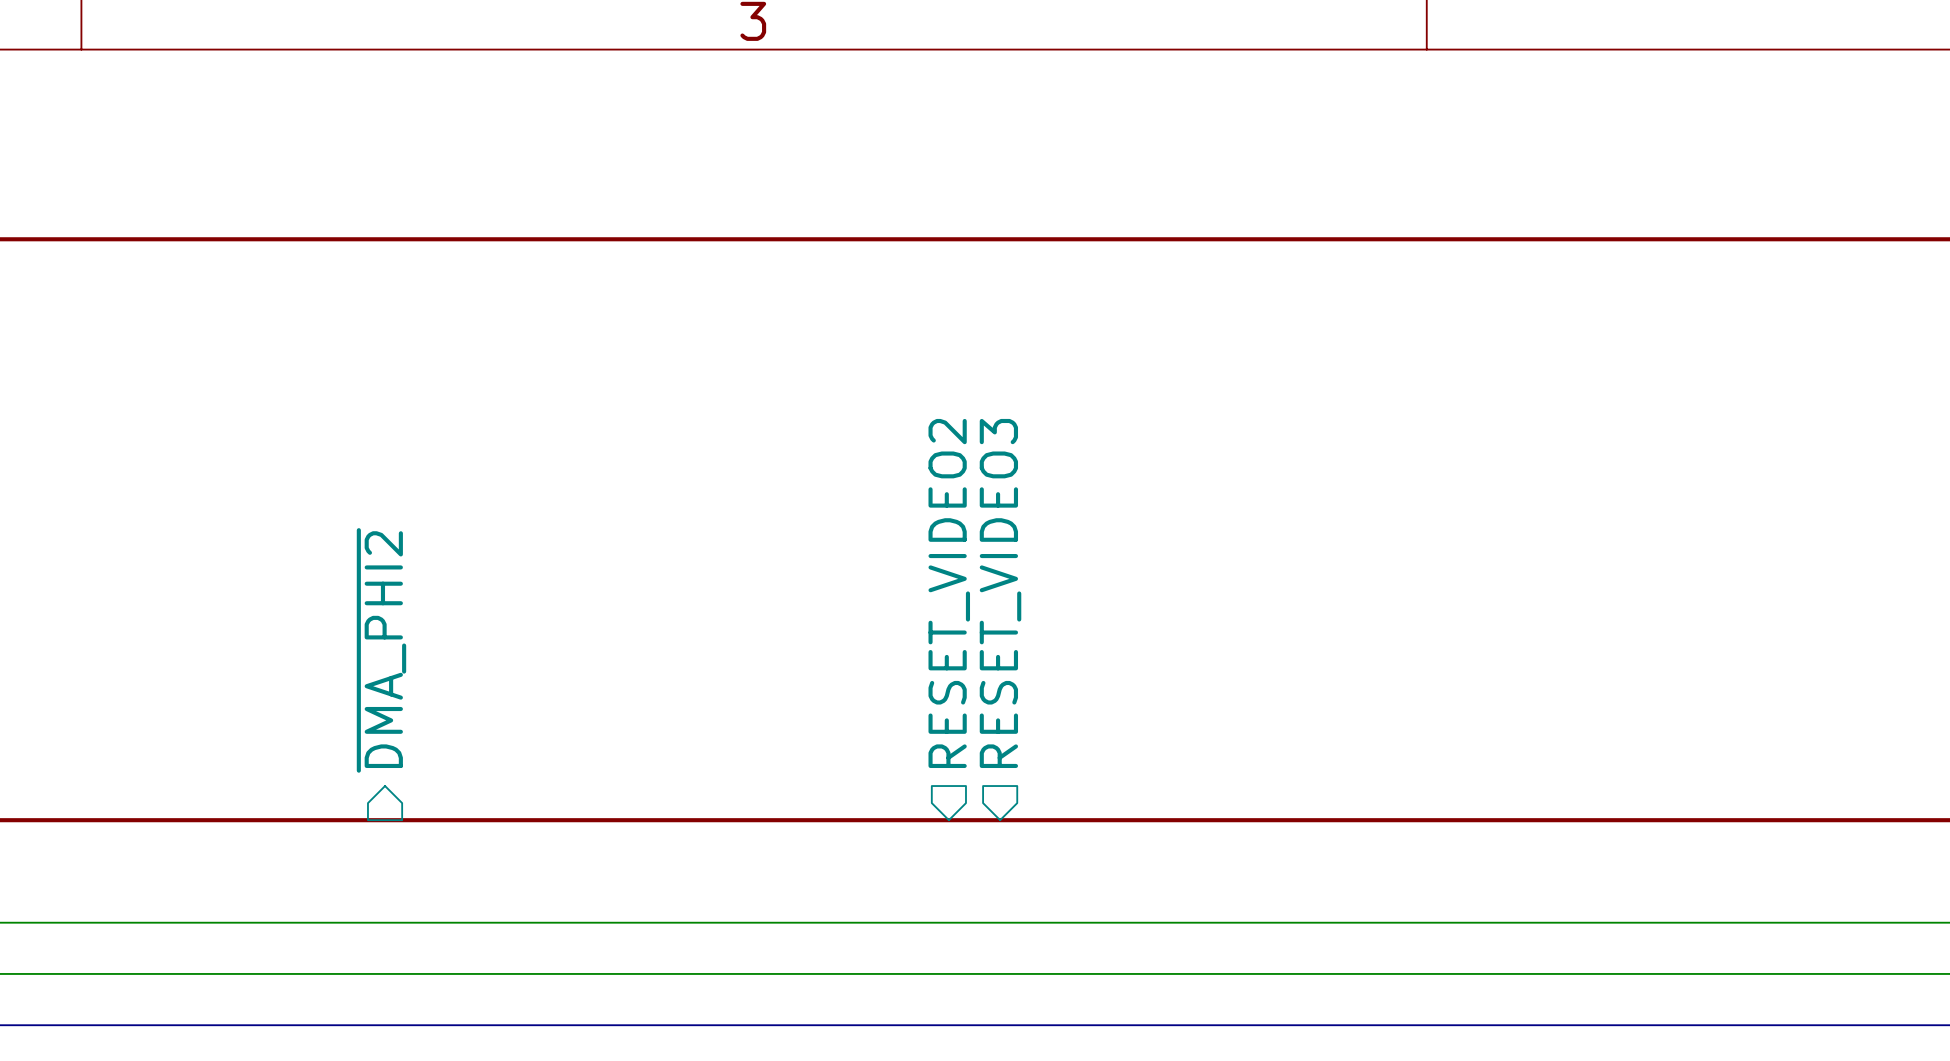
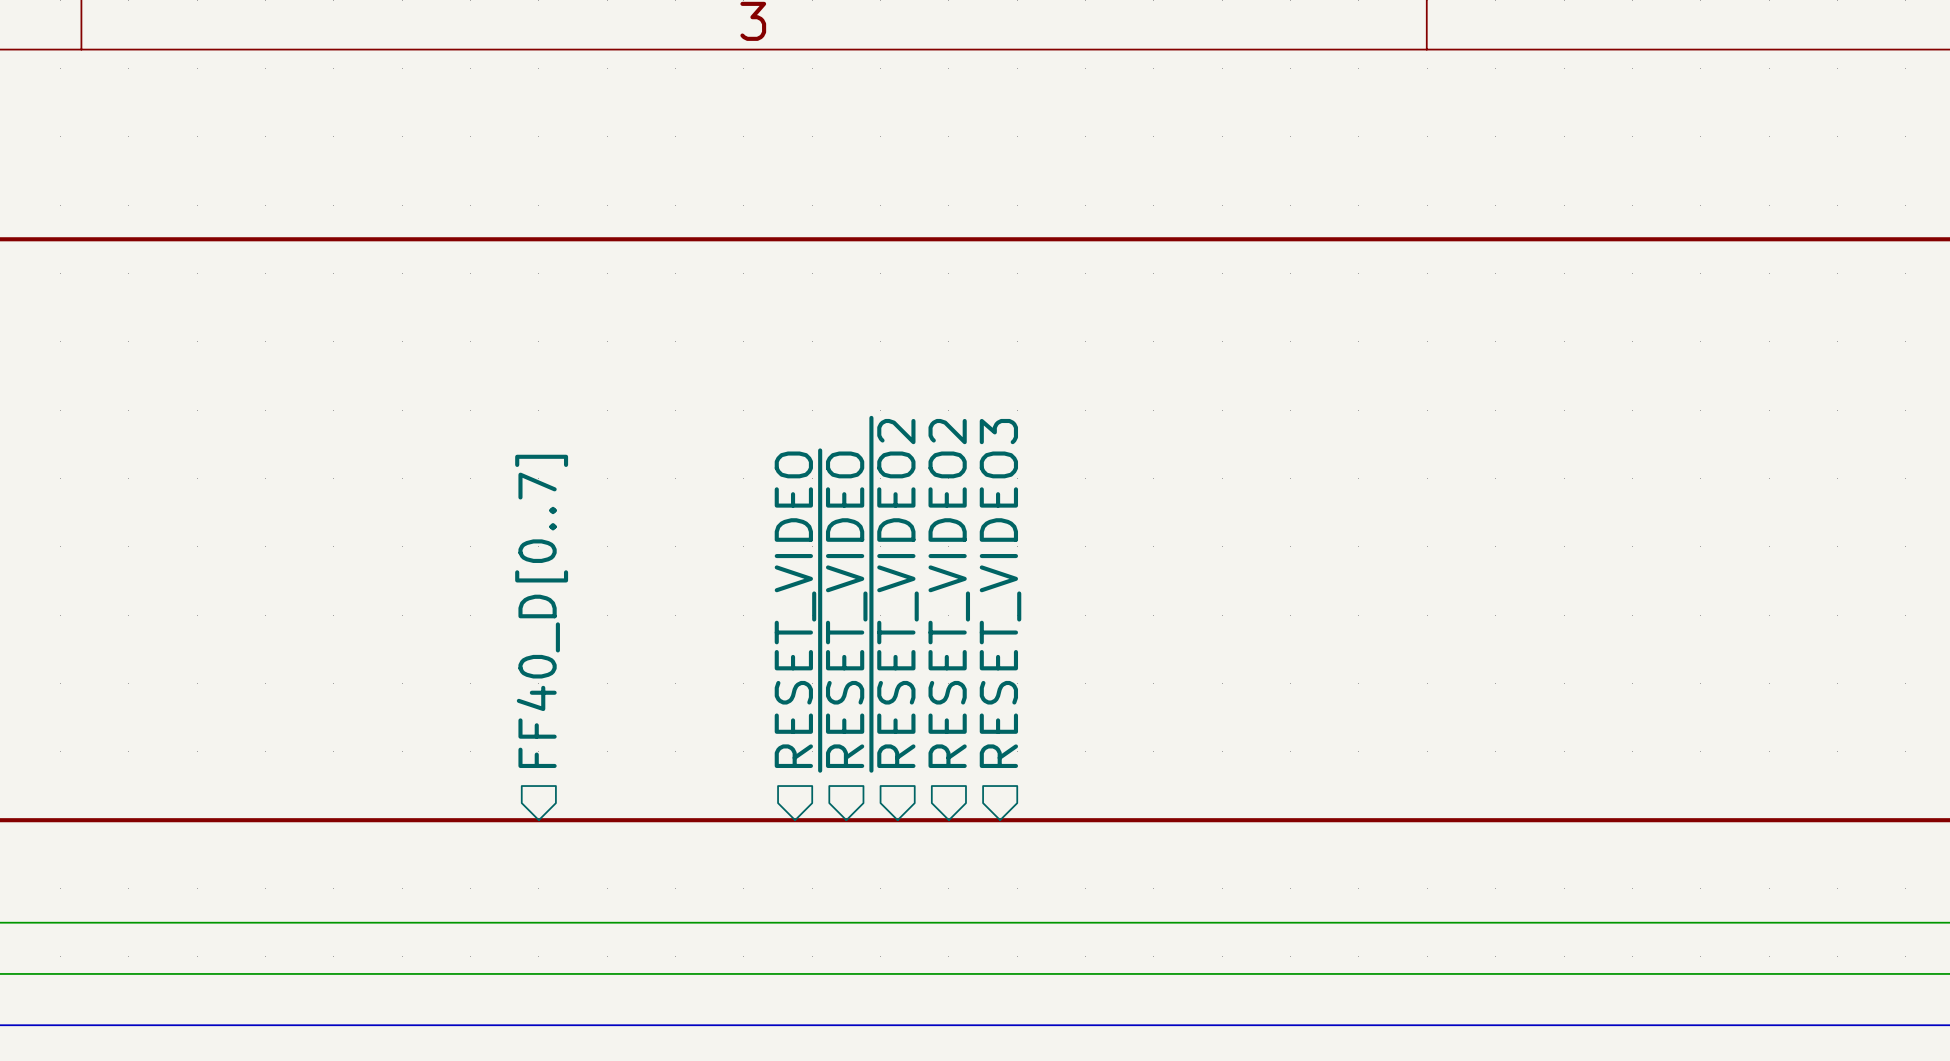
sheet pin: none -> ~{RESET_VIDEO2} (894, 594)
sheet pin: none -> RESET_VIDEO (795, 609)
sheet pin: none -> ~{RESET_VIDEO} (842, 610)
sheet pin: none -> FF40_D[0..7] (541, 611)
sheet pin: ~{DMA_PHI2} (381, 650) -> none

